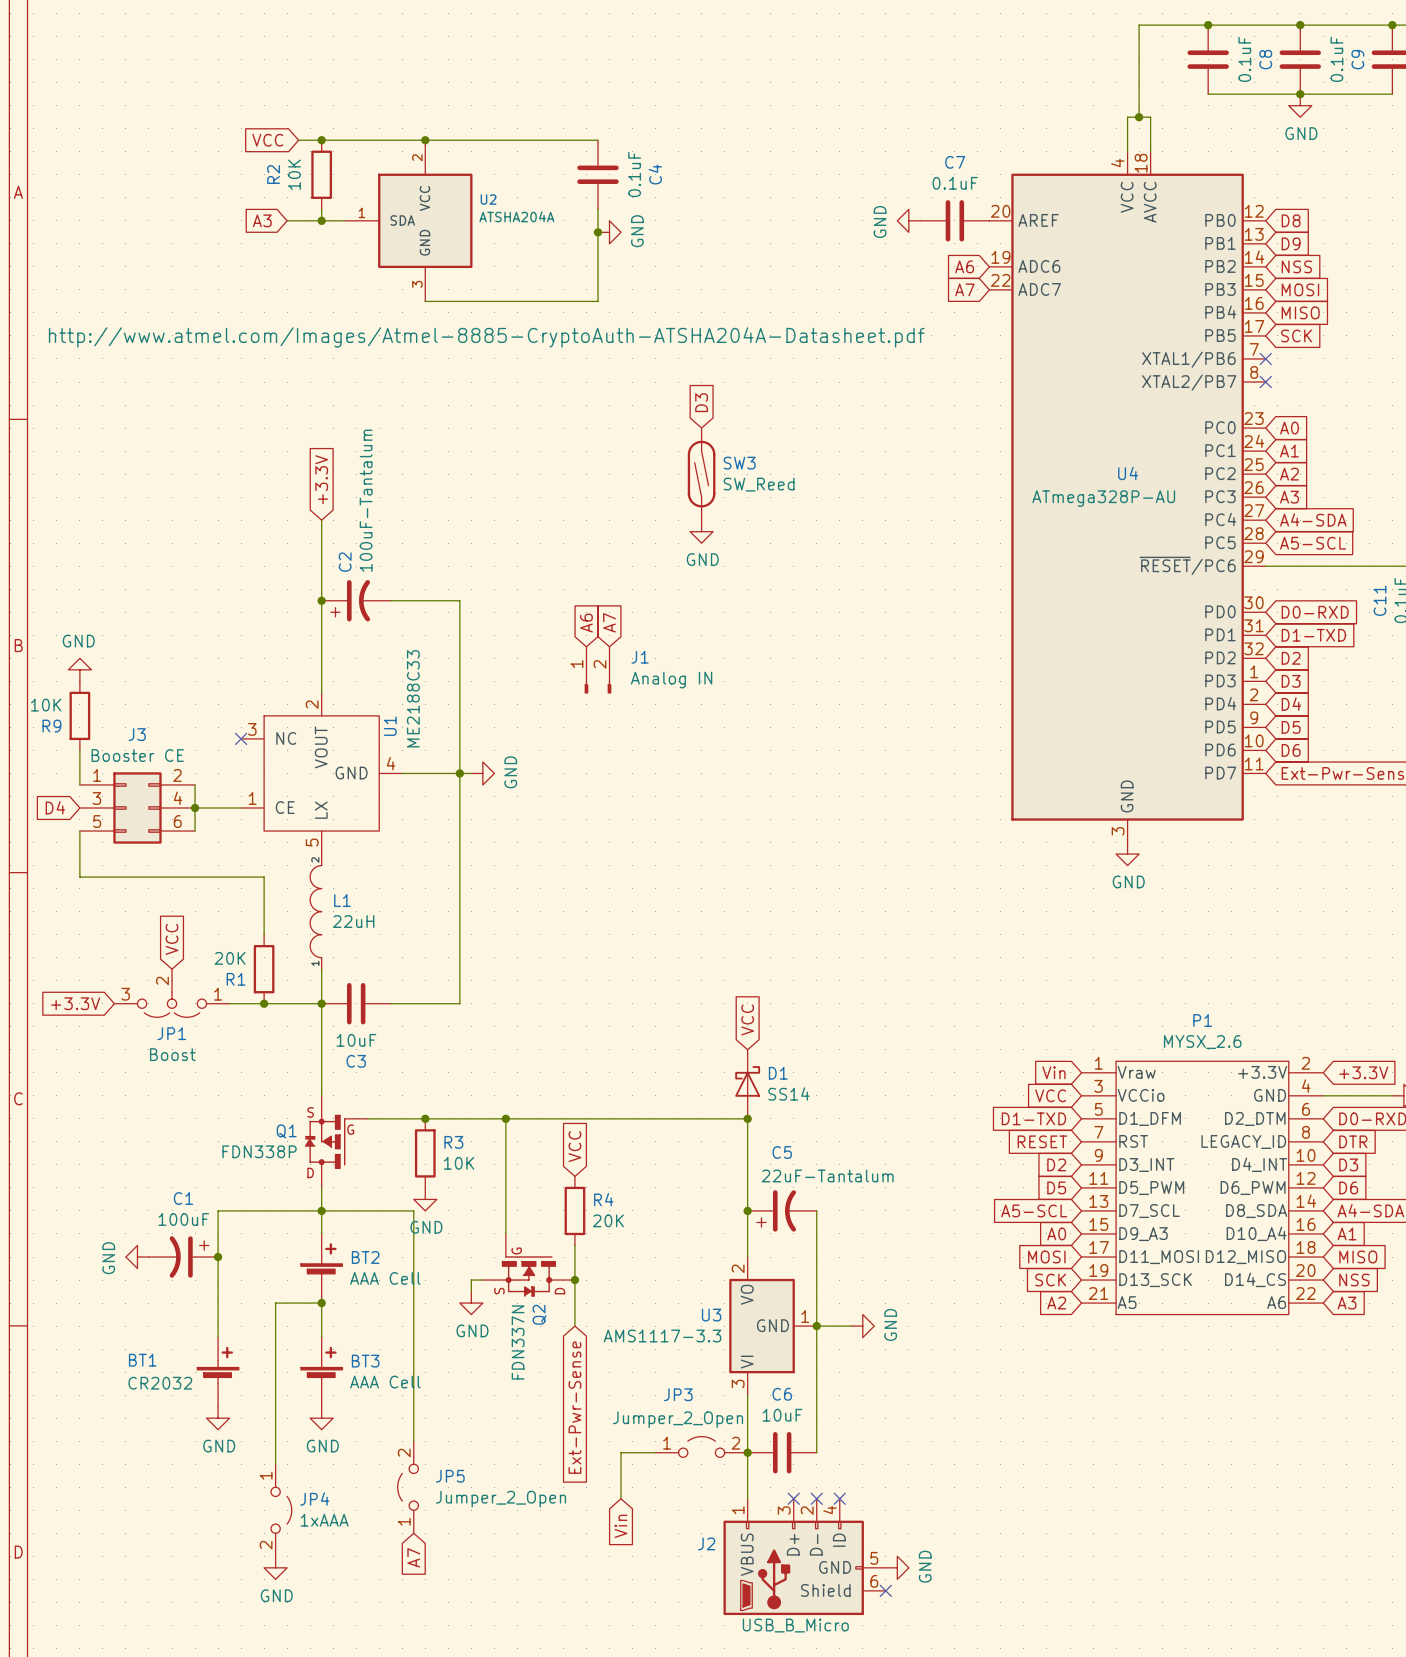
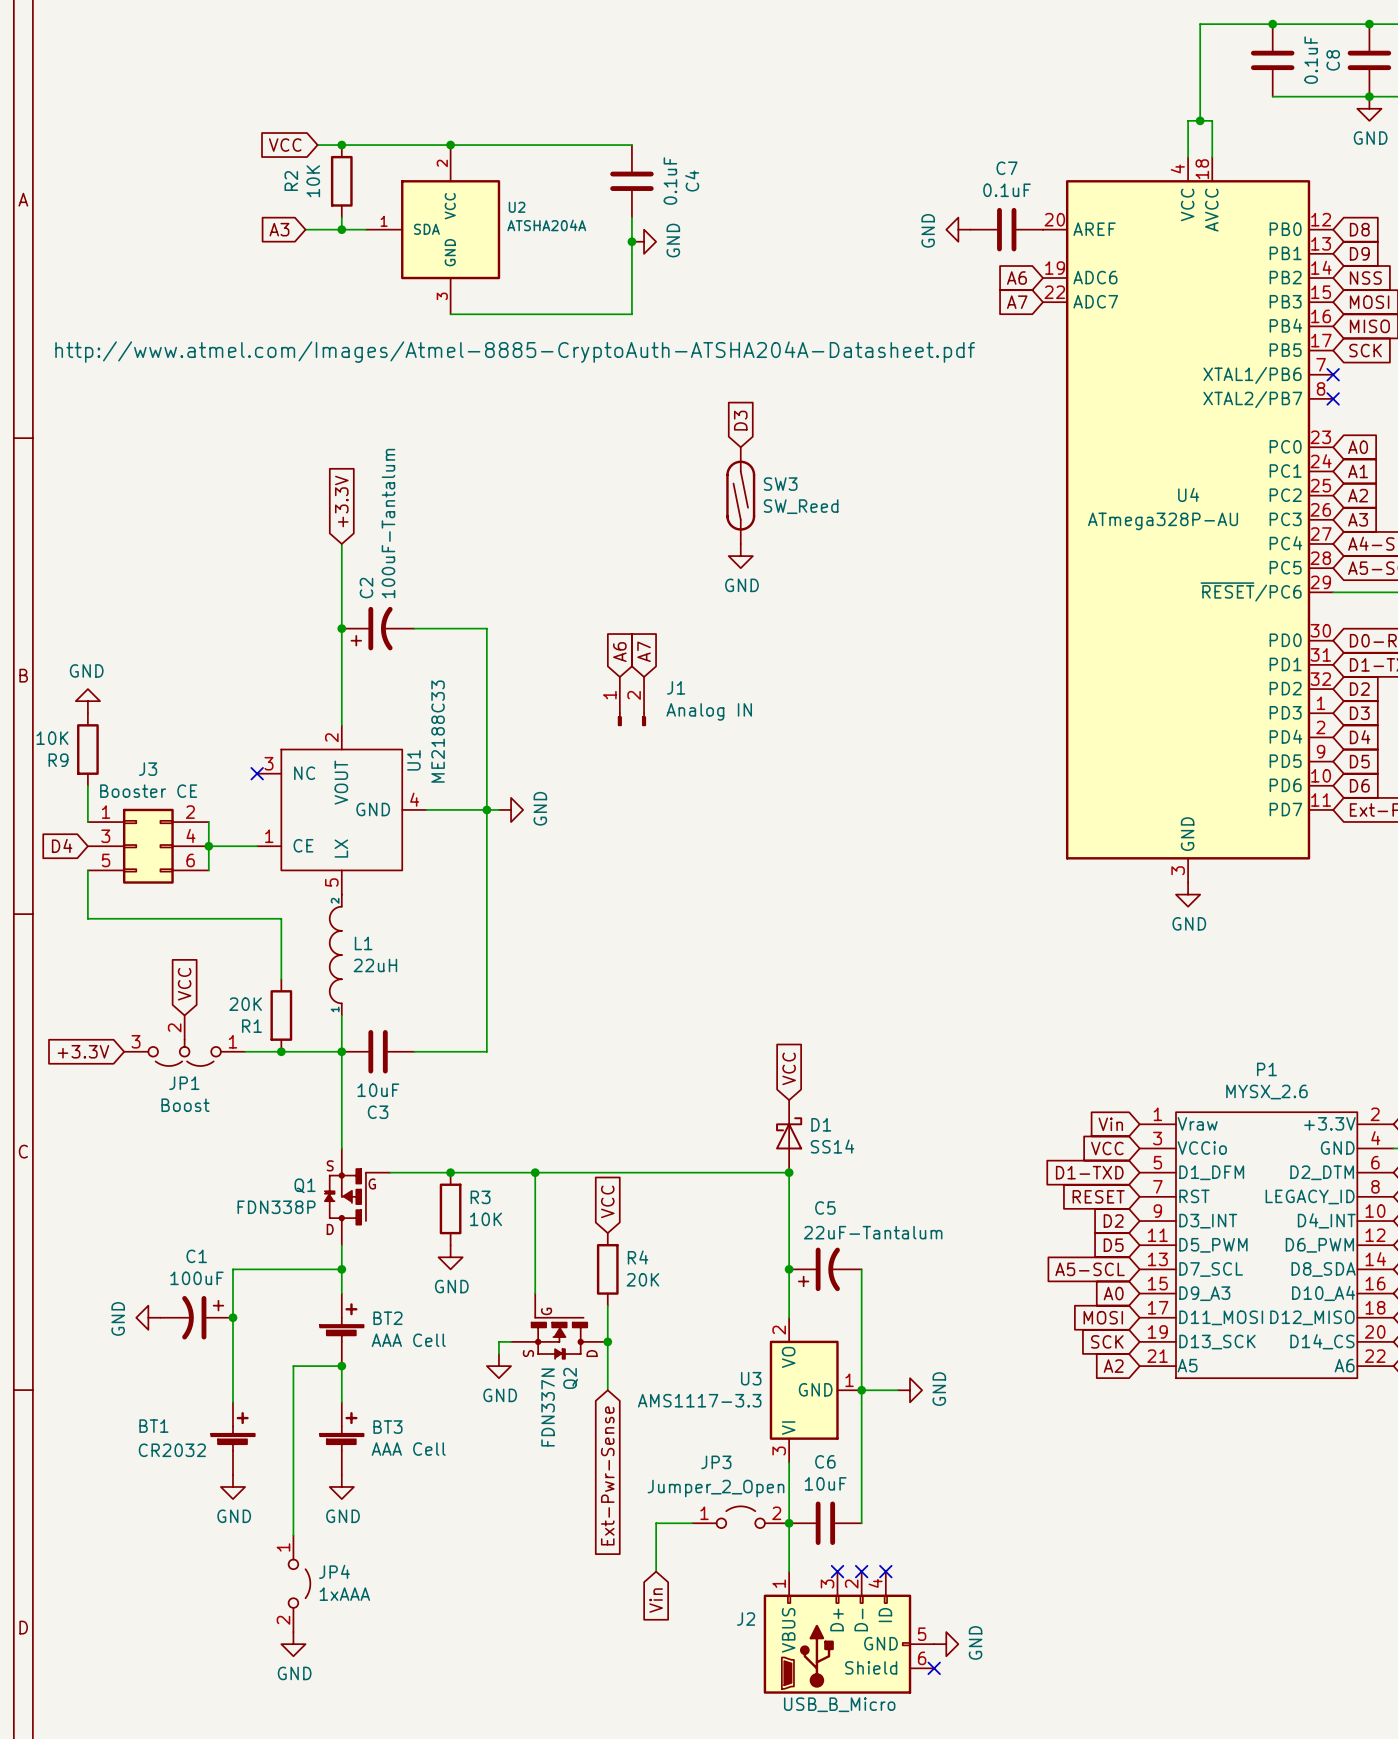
wire: (321, 1210) (413, 1210) (413, 1441) -> none
JP5: Jumper_2_Open (408, 1487) -> none
global label: A7 (413, 1557) -> none

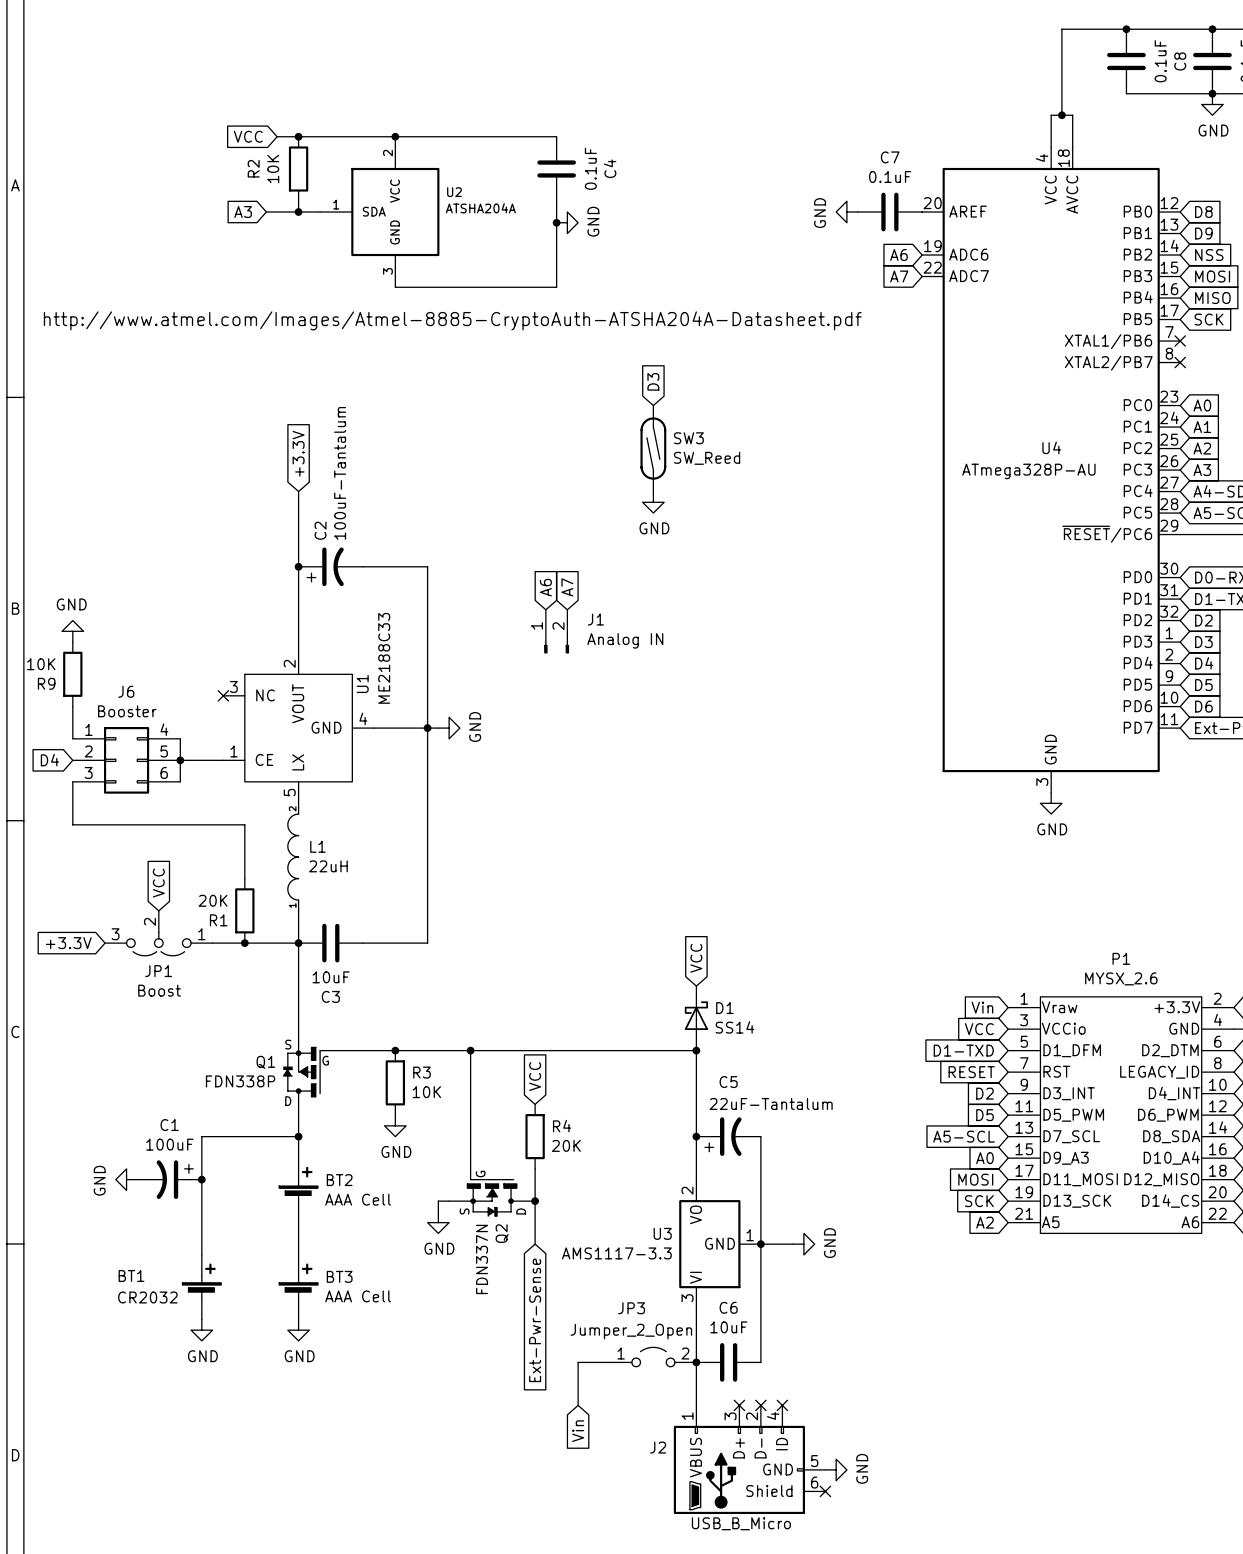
J3 name: J3 (148, 769) -> J6 (126, 691)
J3 value: Booster CE (148, 791) -> Booster (127, 711)
J3 pin number: 2 (190, 812) -> 4 (164, 729)
J3 pin number: 4 (190, 835) -> 5 (164, 751)
J3 pin number: 3 (105, 836) -> 2 (88, 751)
J3 pin number: 5 (106, 860) -> 3 (88, 772)
wire: (341, 1366) (293, 1366) (293, 1535) -> none
junction: (341, 1366) -> none
JP4: 1xAAA (299, 1583) -> none
power symbol: GND (293, 1644) -> none

